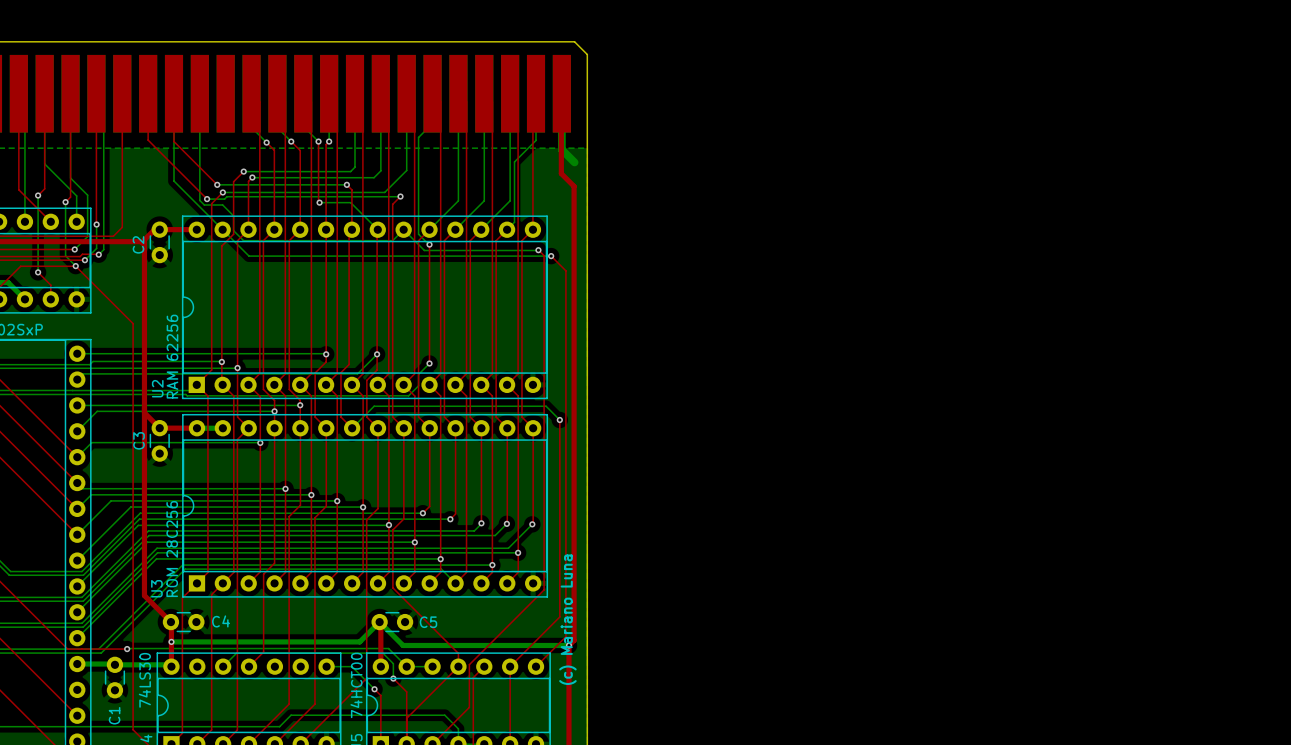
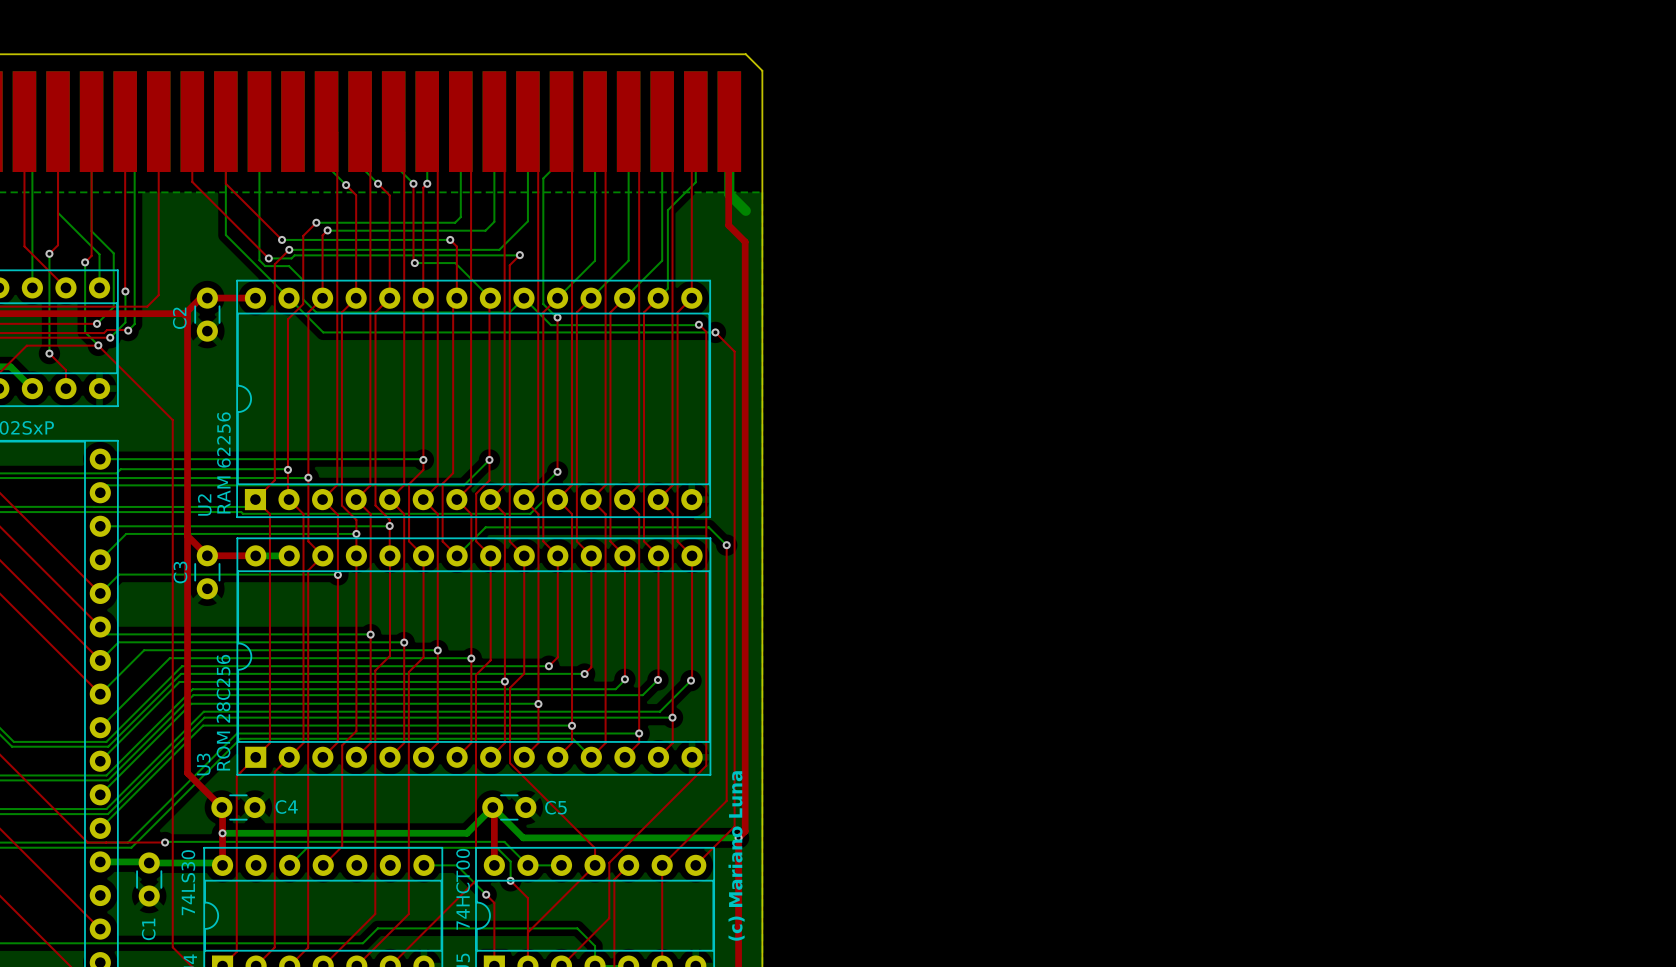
text position: (c) Mariano Luna (567, 619) -> (c) Mariano Luna (736, 855)

